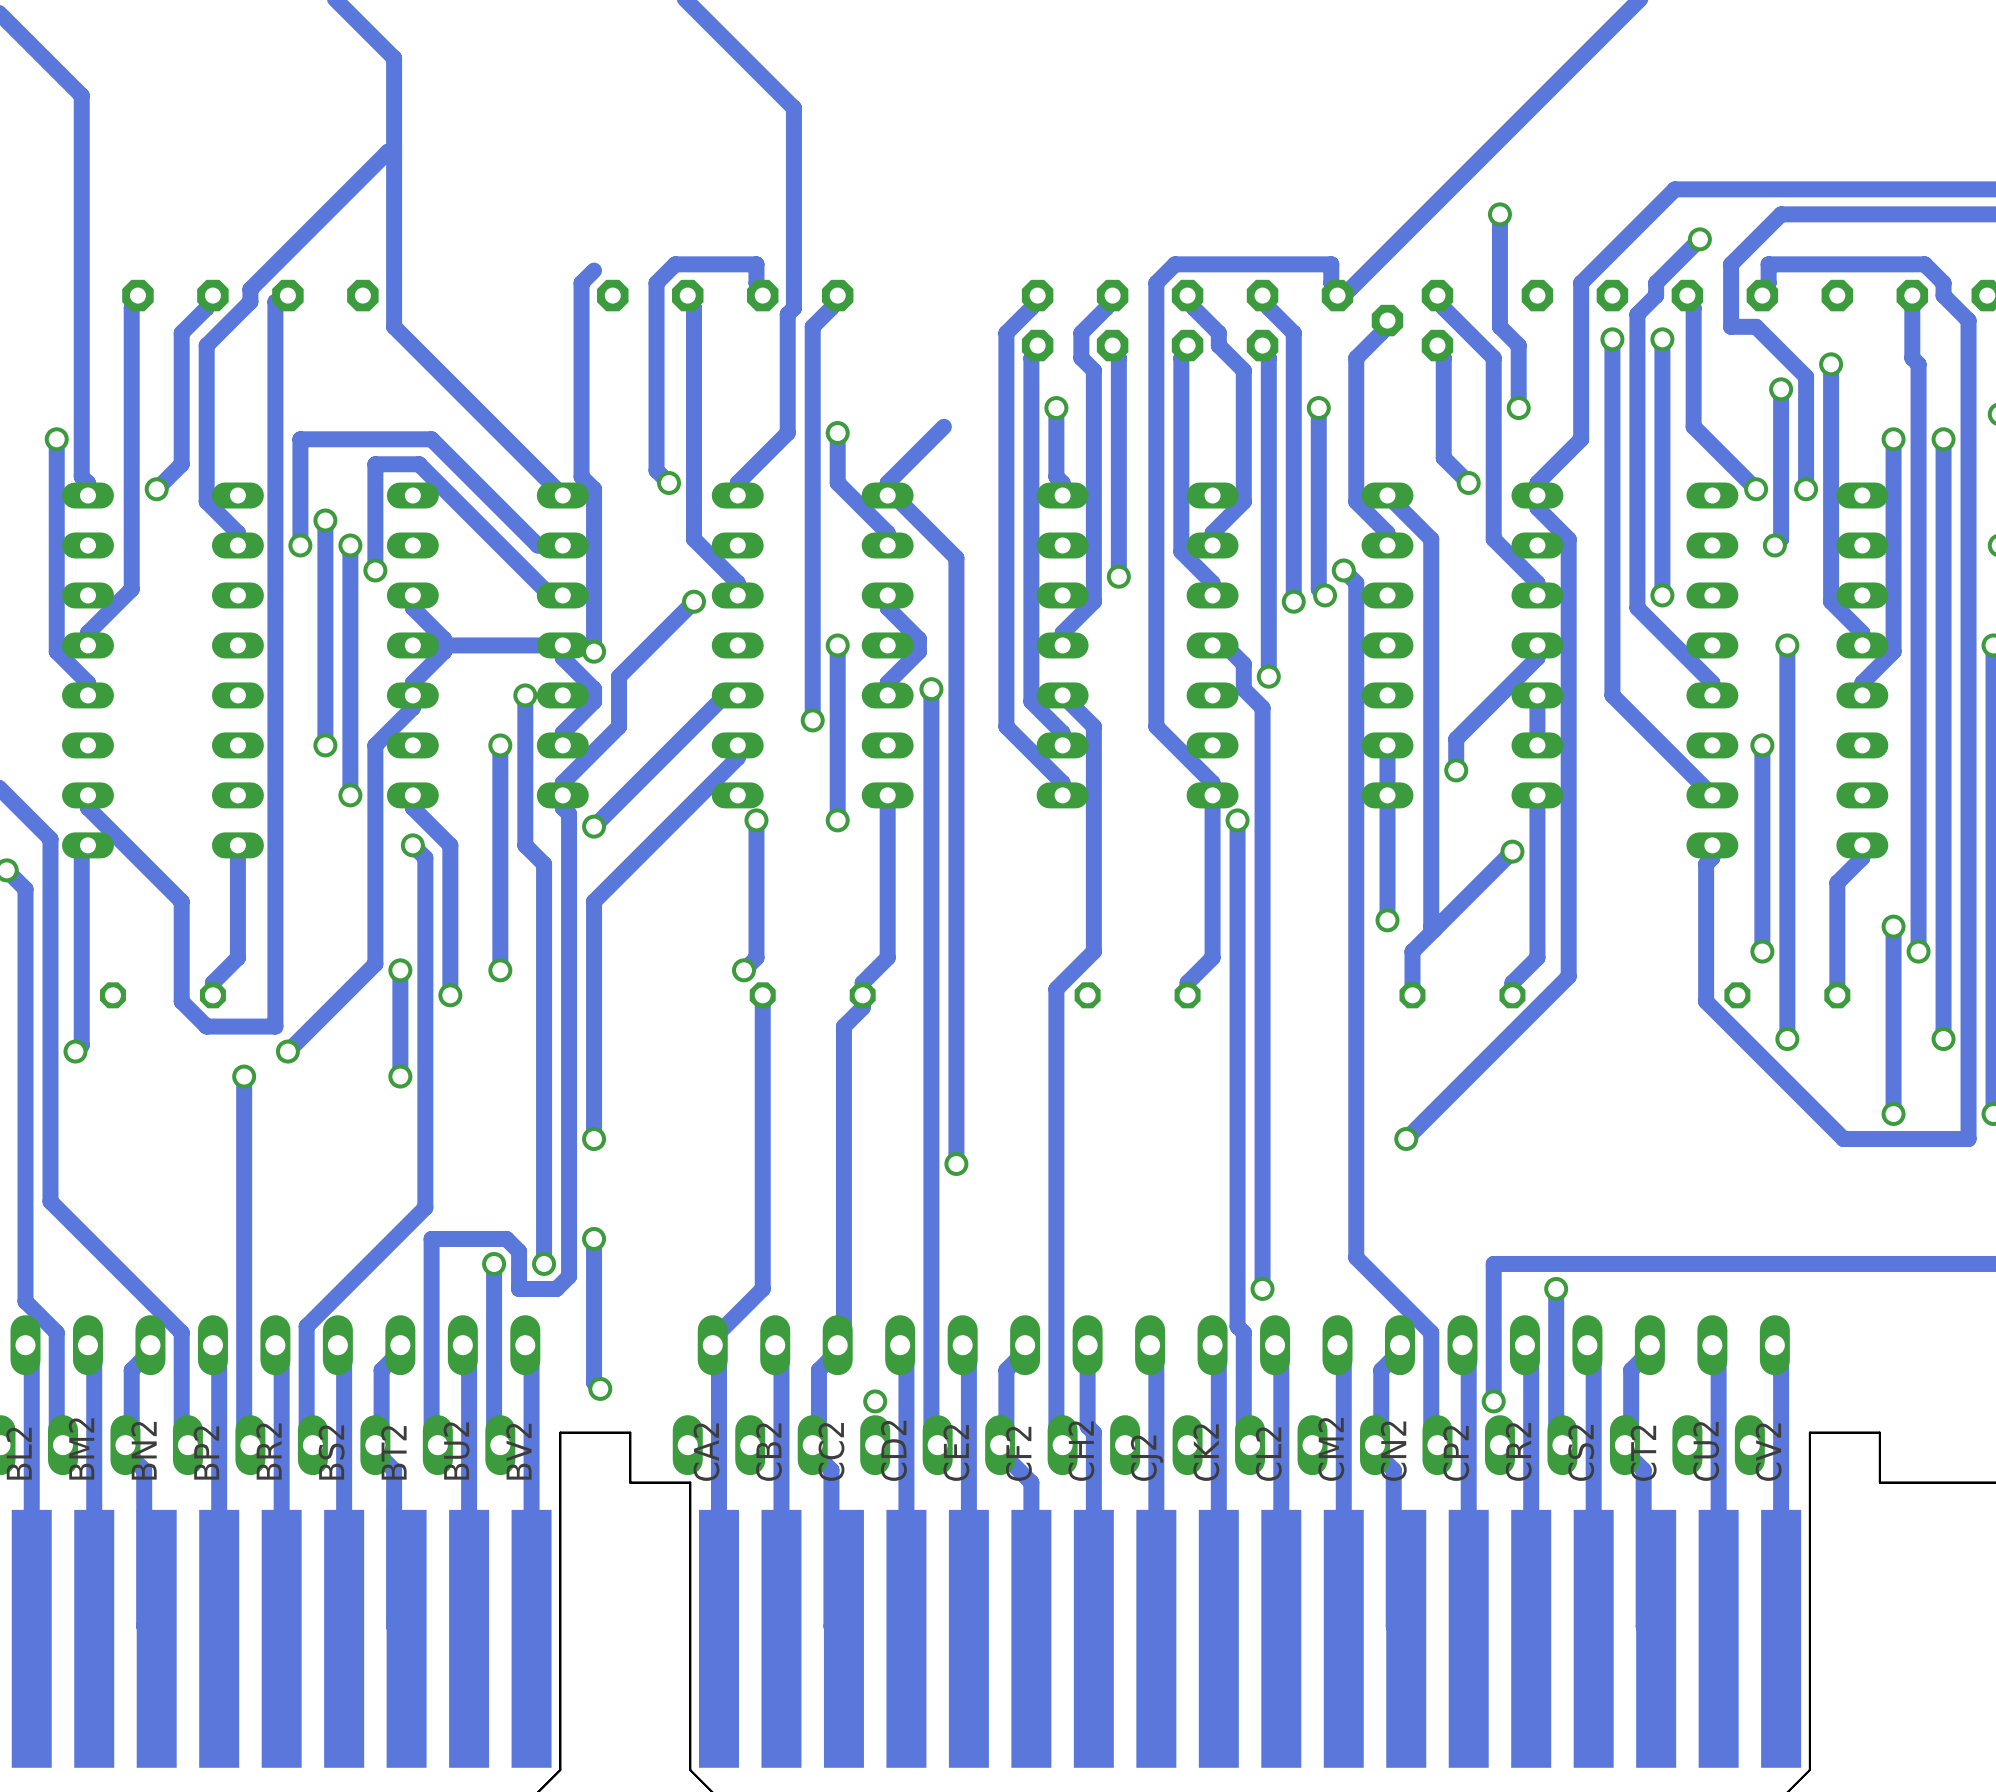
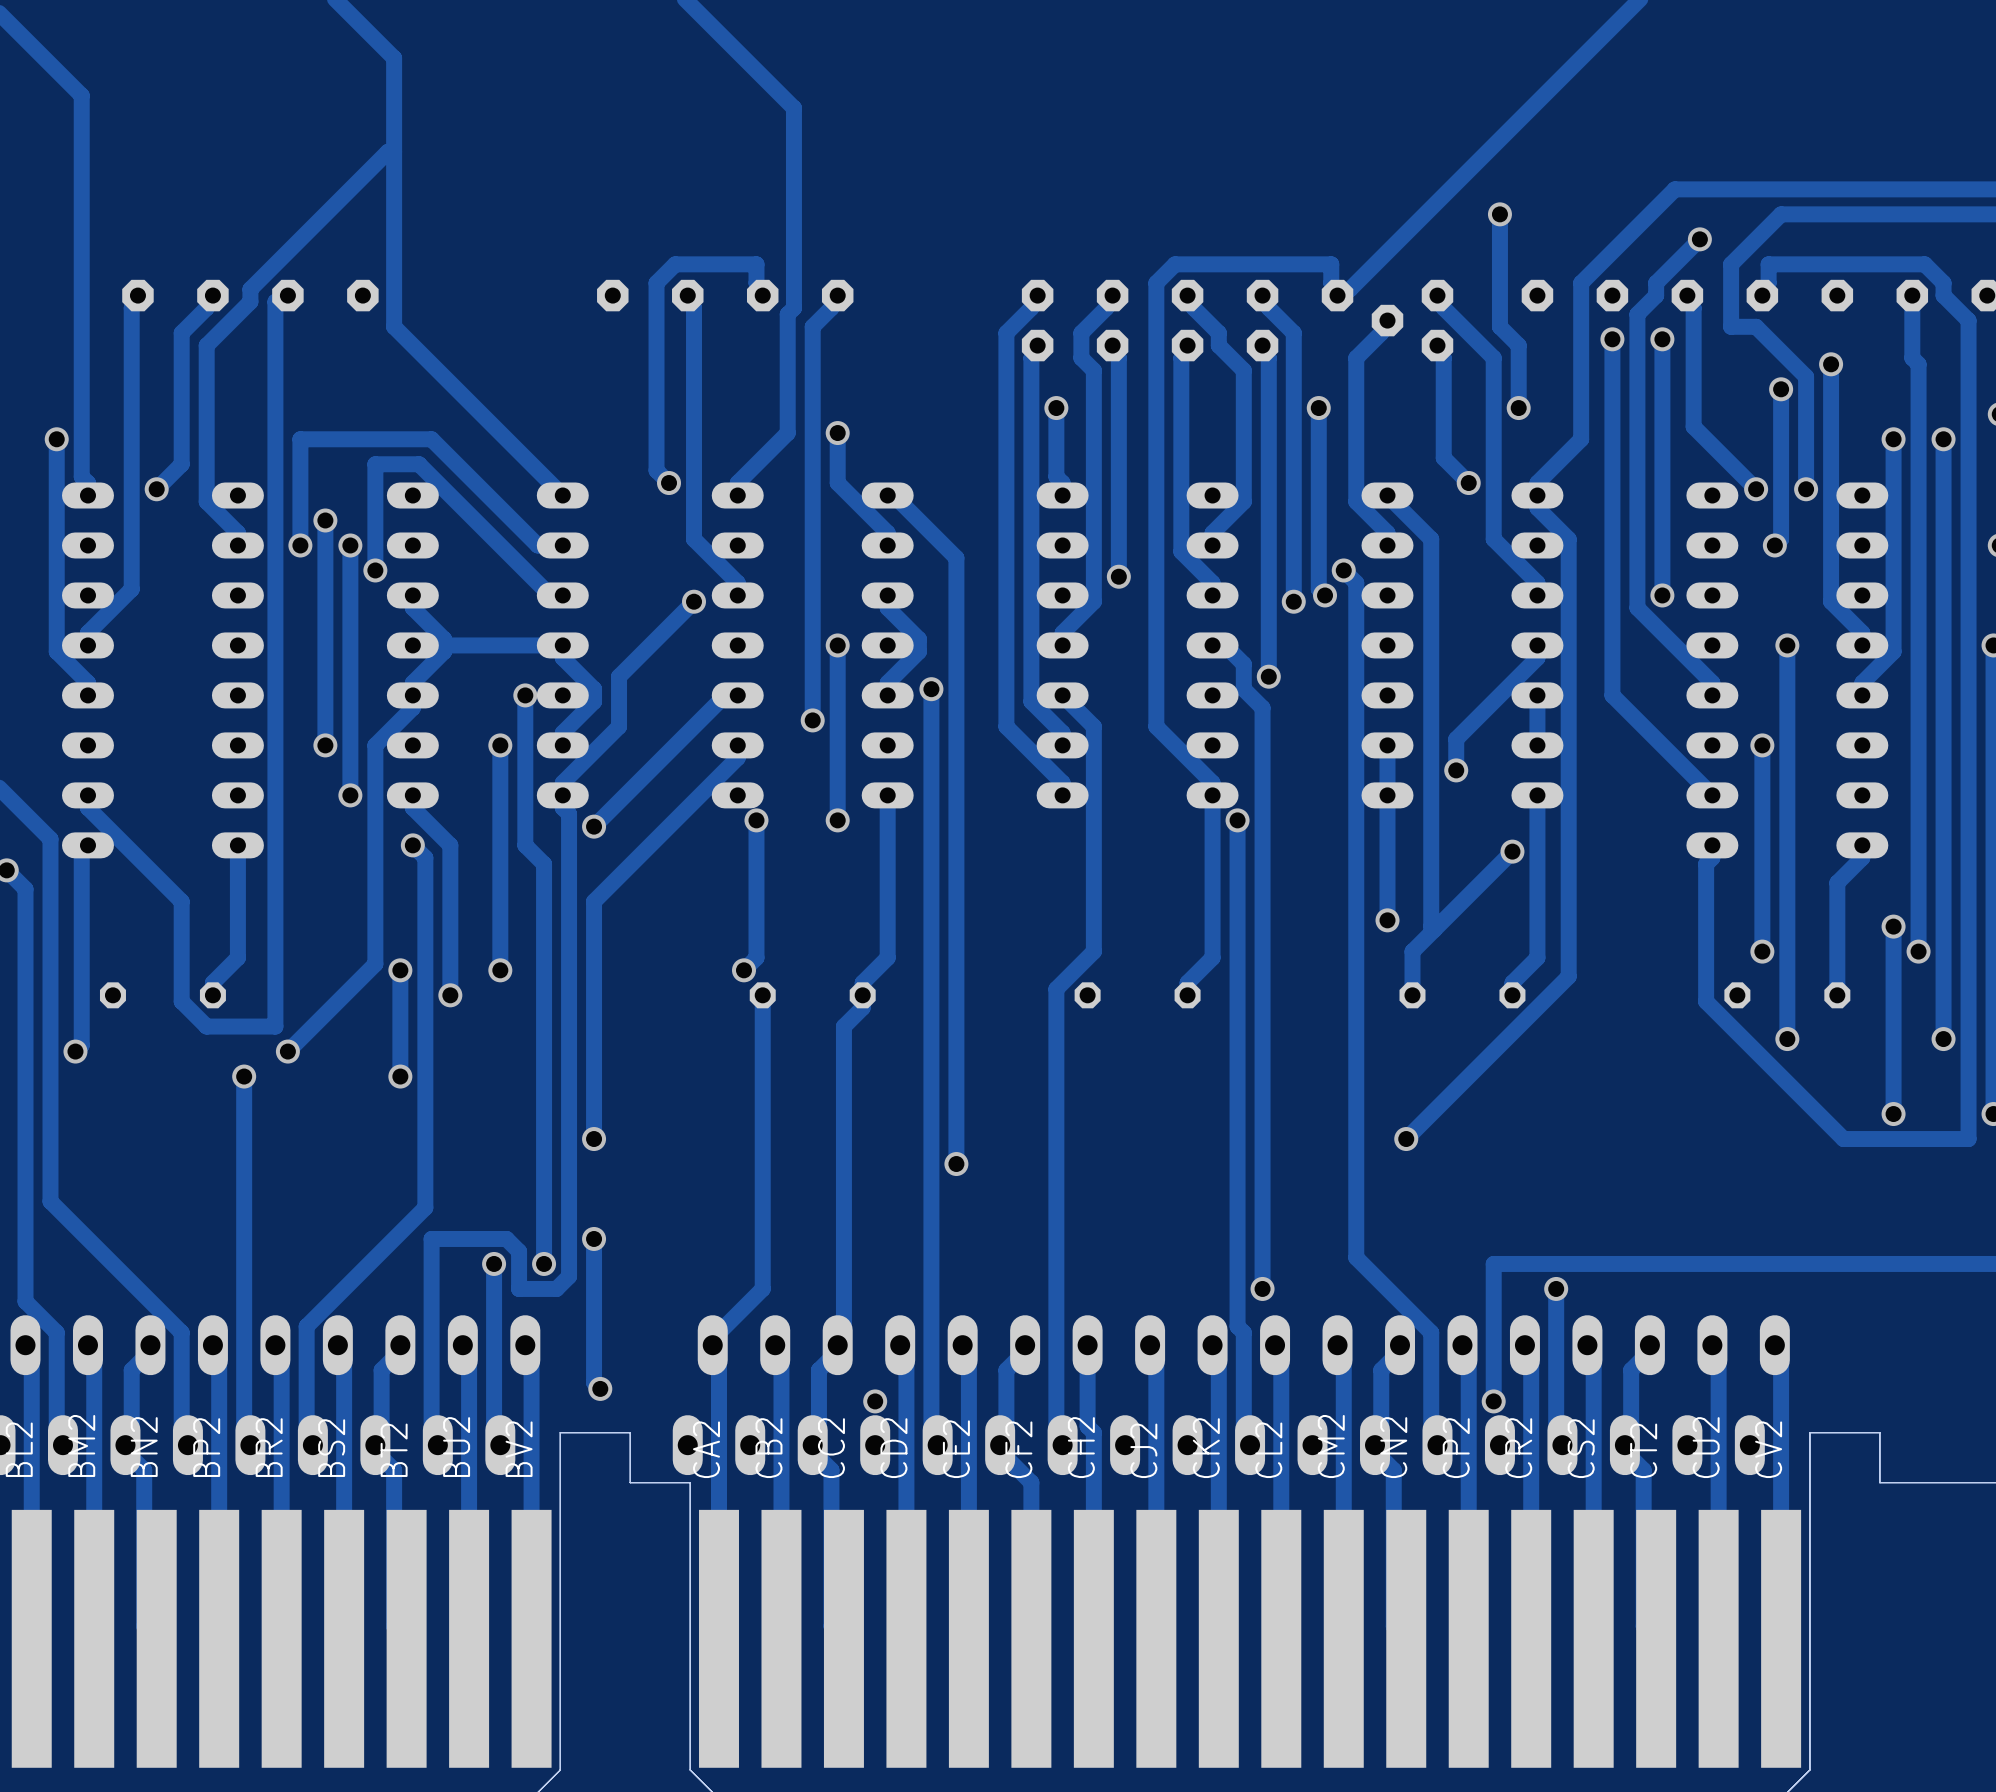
track: (594, 270) (581, 283) (581, 476) (594, 489) (594, 651) -> none
track: (943, 426) (887, 483) (887, 495) -> none
via: (594, 651) -> none

